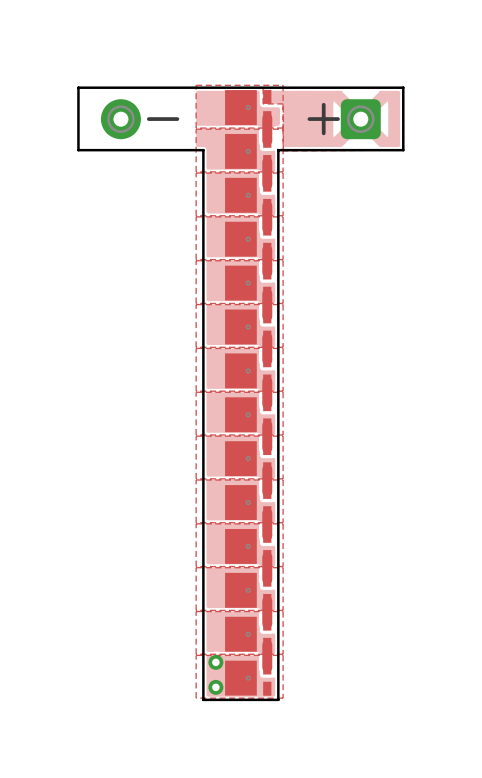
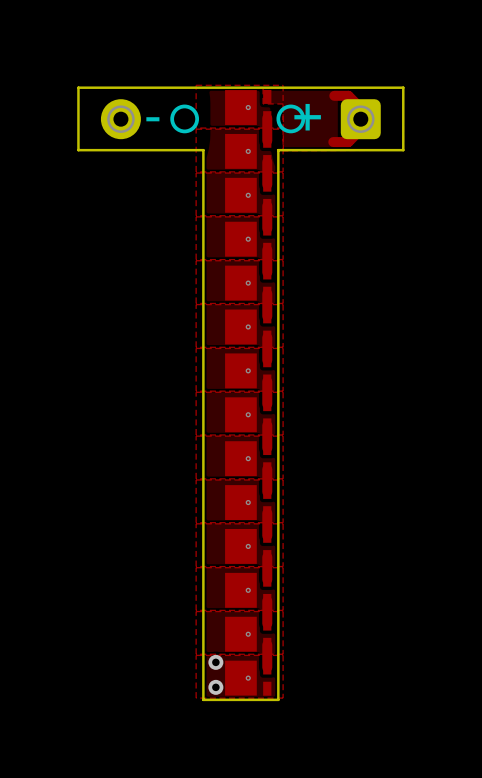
track: none -> (334, 95) (348, 95) (371, 118) (348, 142) (333, 142)
drawing: none -> [170, 104, 200, 134]
drawing: none -> [276, 104, 306, 134]

